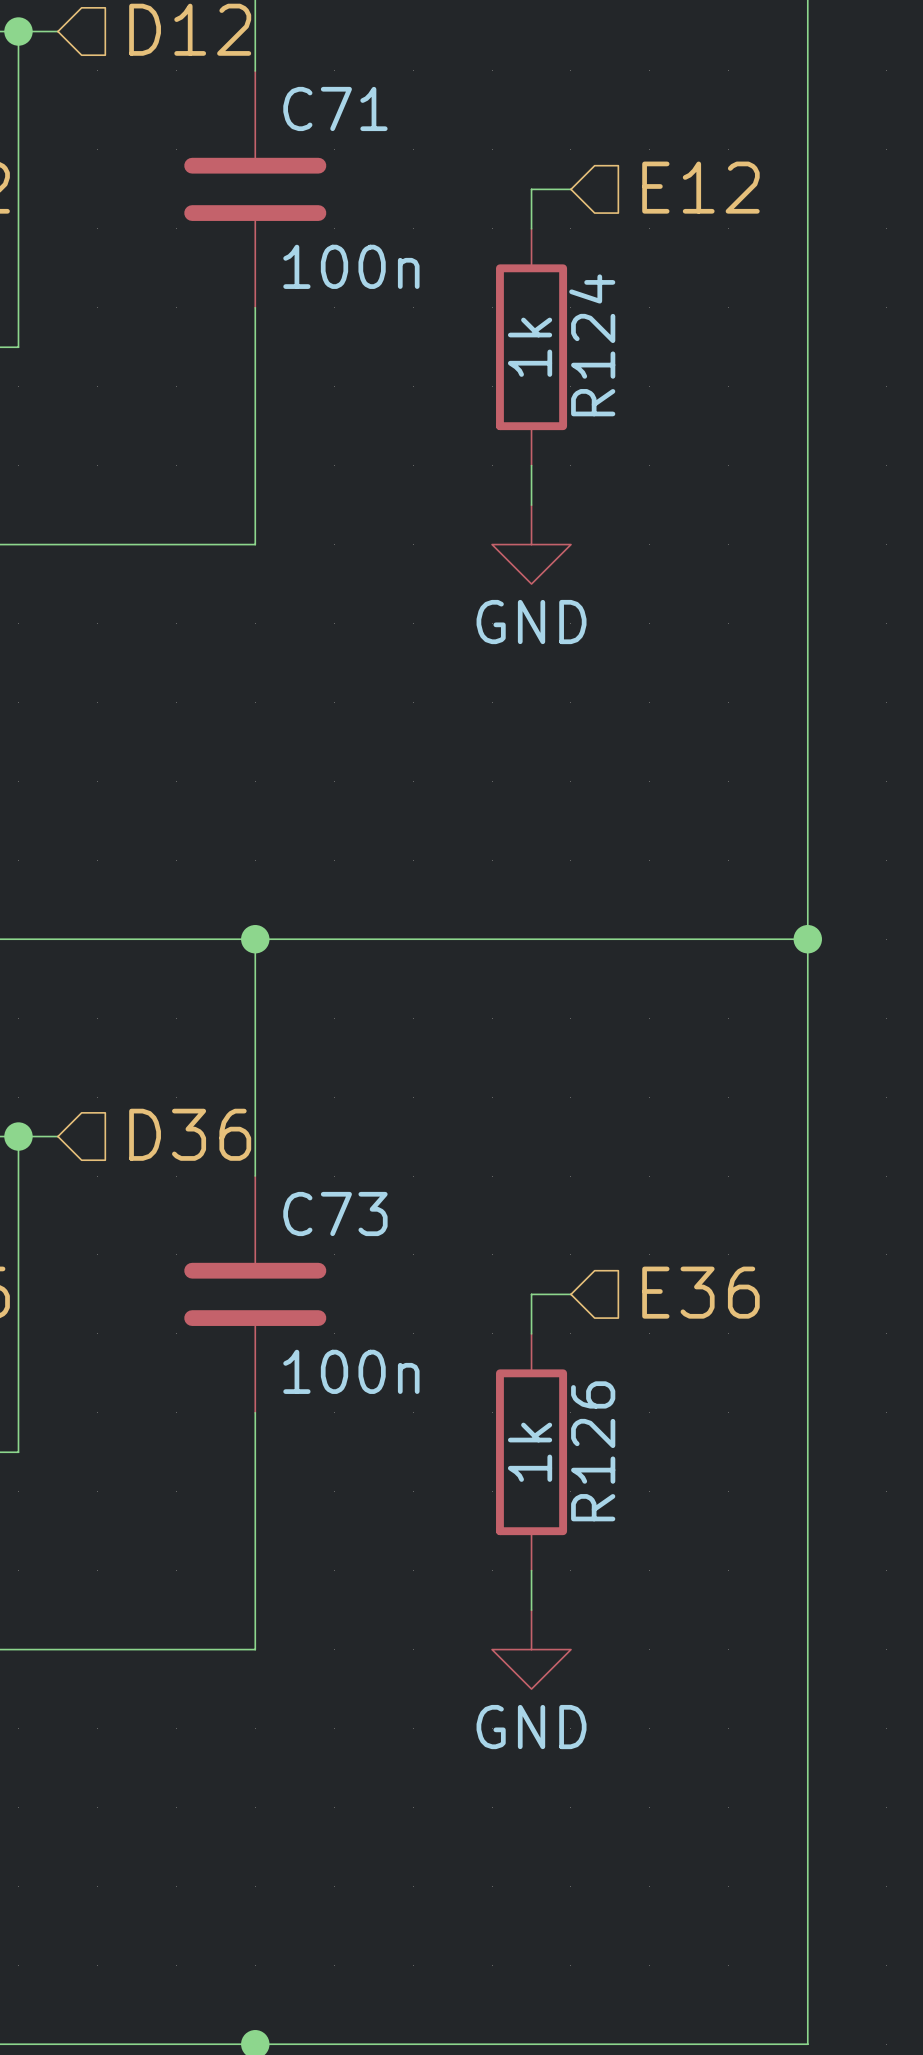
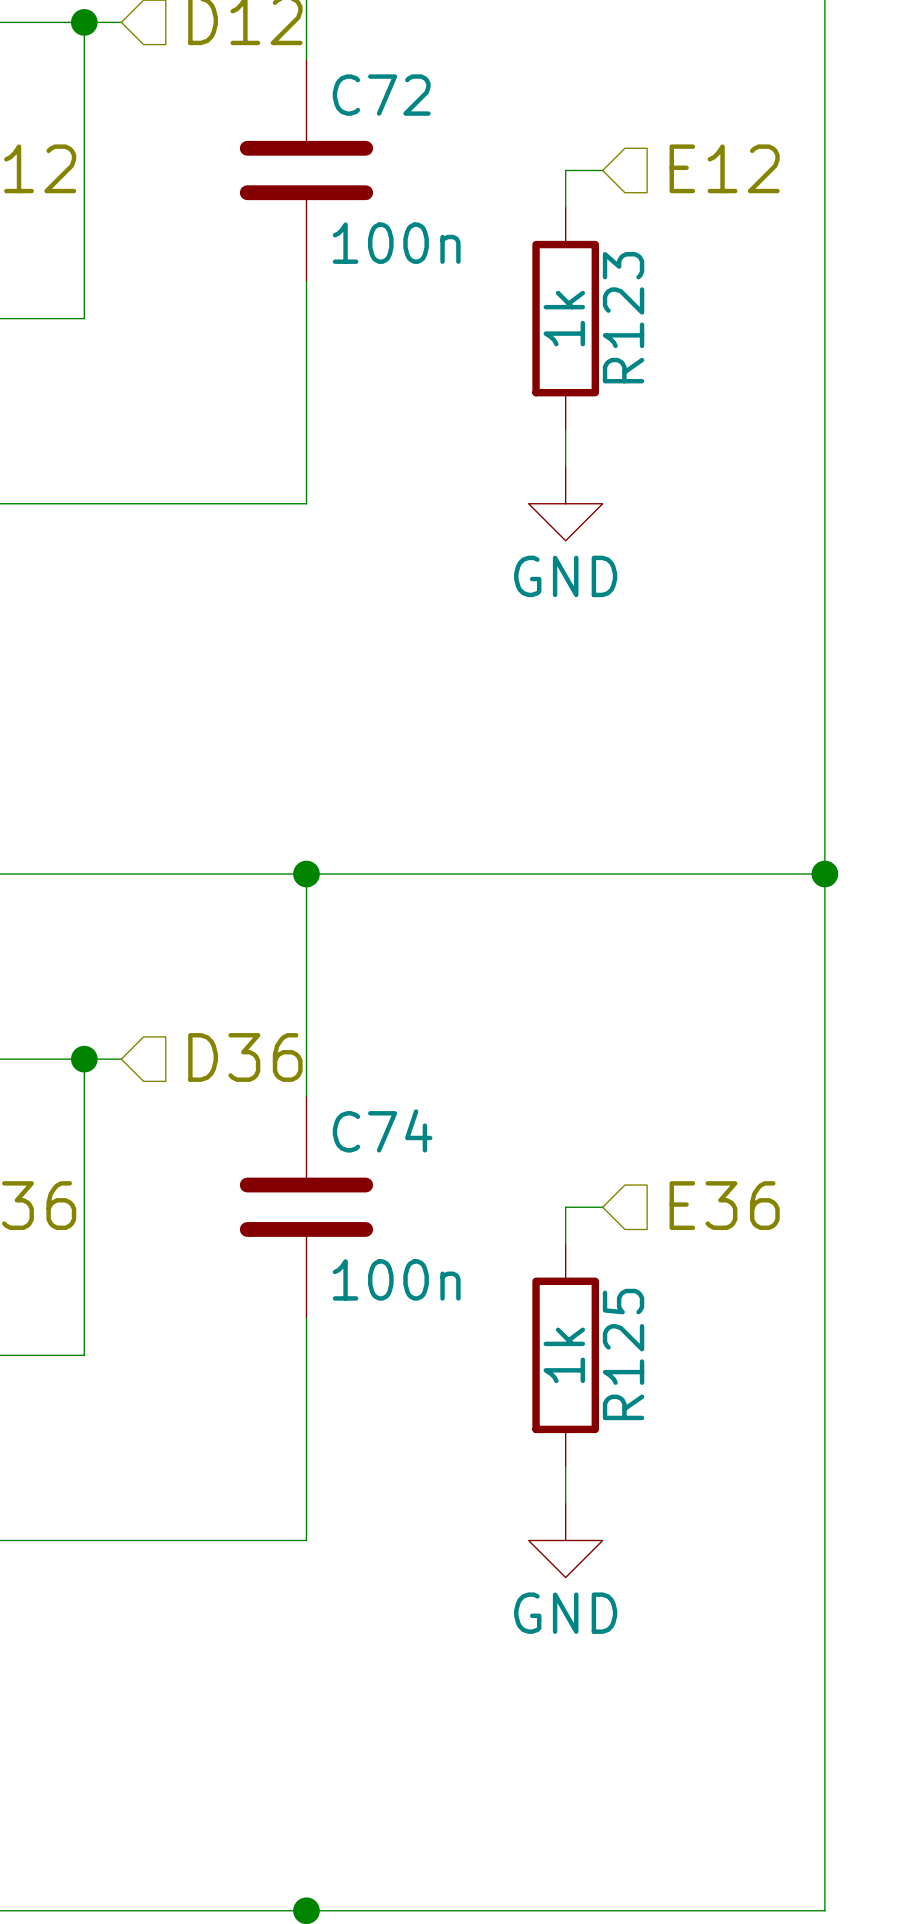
C71 name: C71 (335, 108) -> C72 (381, 95)
R124 name: R124 (592, 345) -> R123 (623, 317)
C73 name: C73 (335, 1213) -> C74 (382, 1130)
R126 name: R126 (593, 1451) -> R125 (623, 1354)

